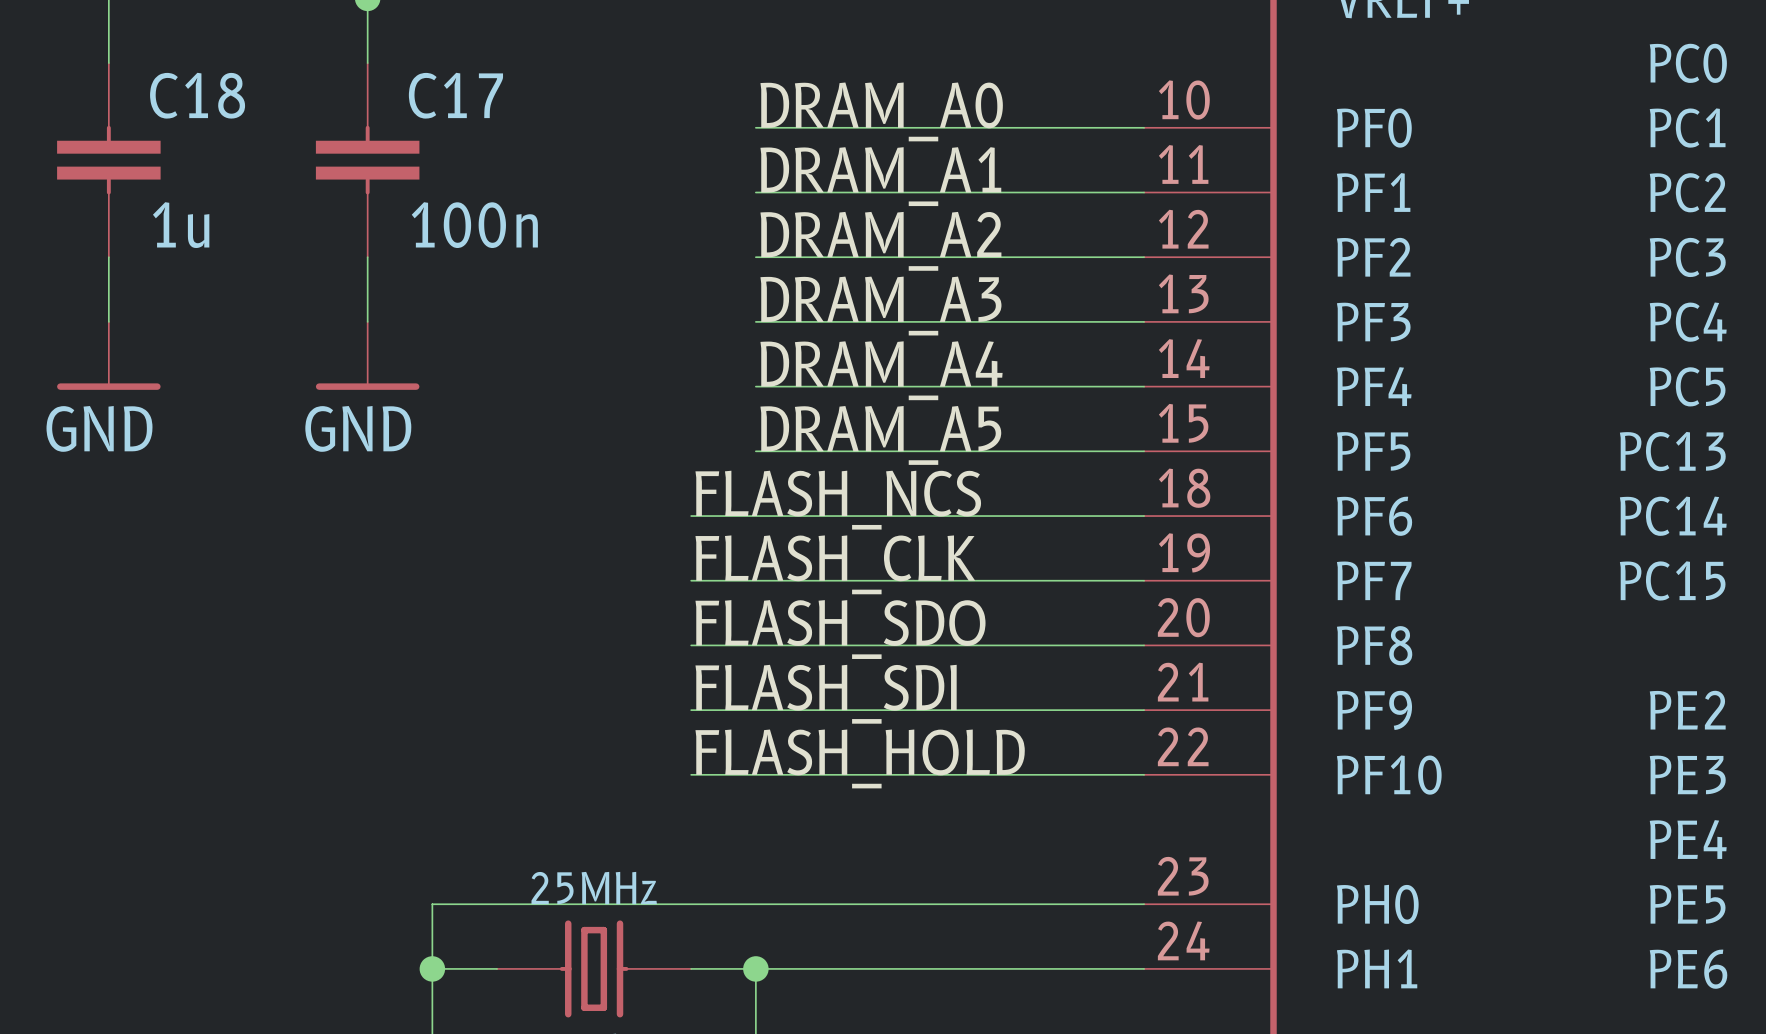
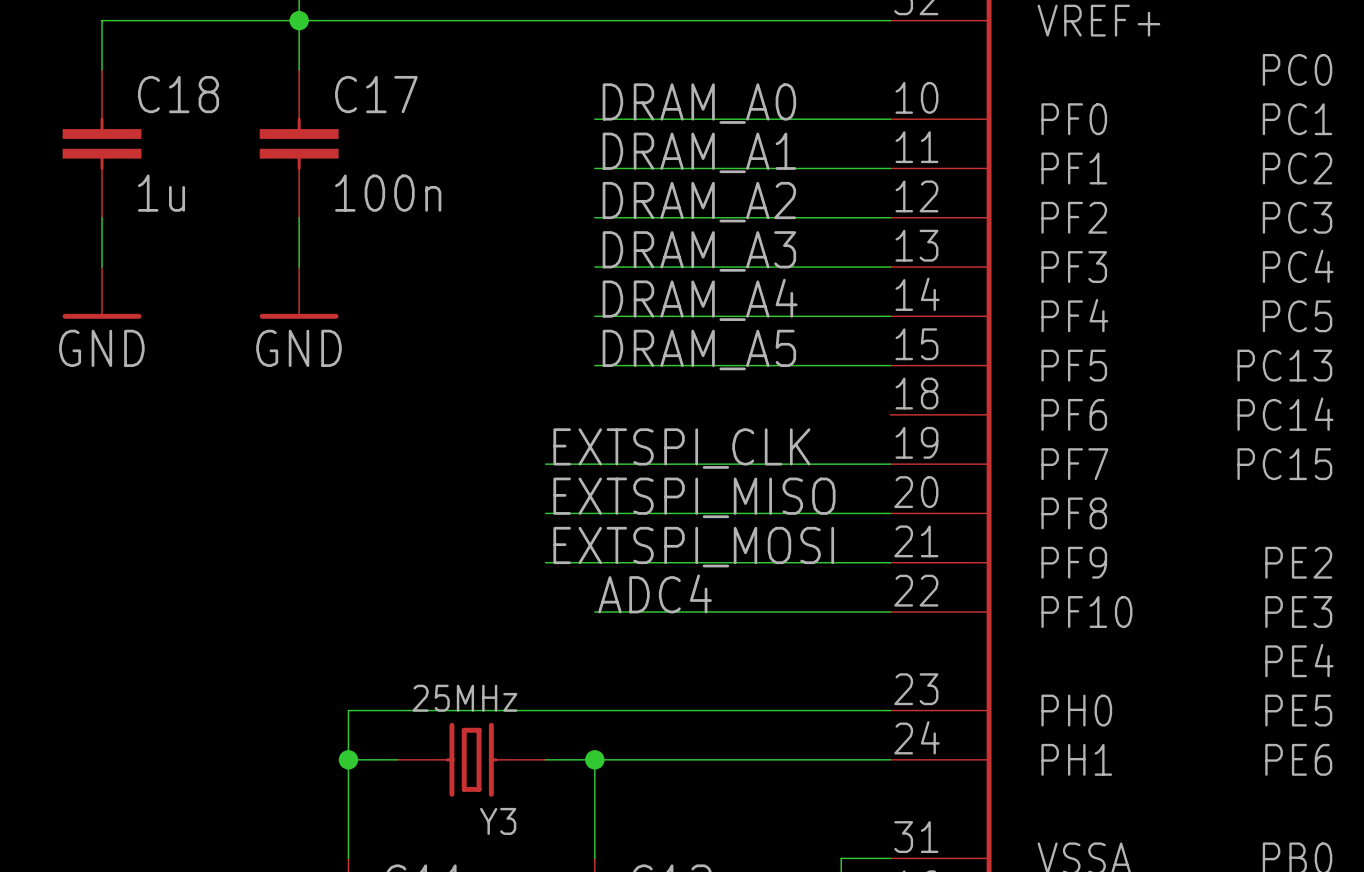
label: FLASH_NCS (838, 500) -> none
wire: (691, 516) (1144, 516) -> none
label: FLASH_CLK (835, 564) -> EXTSPI_CLK (681, 448)
label: FLASH_SDO (840, 629) -> EXTSPI_MISO (694, 497)
label: FLASH_SDI (826, 694) -> EXTSPI_MOSI (693, 547)
label: none -> ADC4 (655, 593)
label: FLASH_HOLD (860, 758) -> none
wire: (691, 774) (755, 774) -> none

